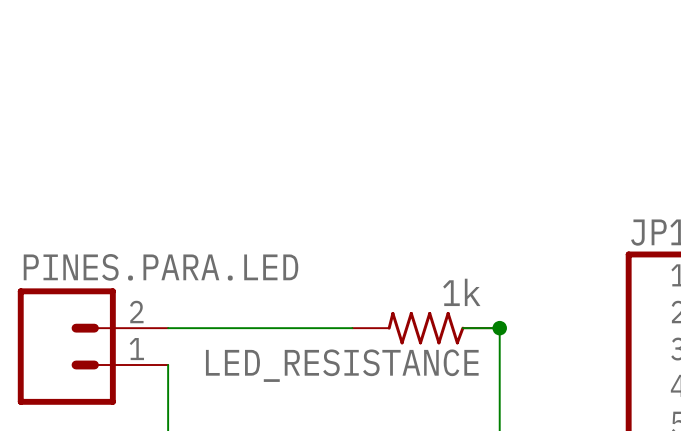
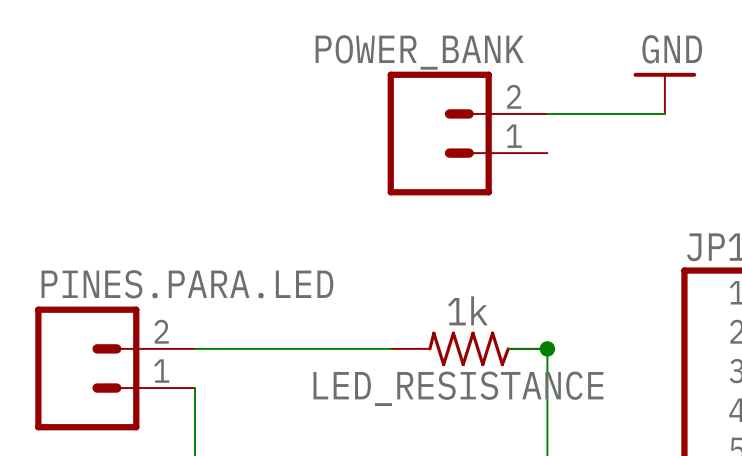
power symbol: none -> GND (664, 93)
wire: none -> (547, 113) (664, 113)
POWER_BANK: none -> (467, 133)
LED_RESISTANCE value position: 1k (461, 292) -> 1k (467, 310)
LED_RESISTANCE name position: LED_RESISTANCE (342, 365) -> LED_RESISTANCE (458, 388)

